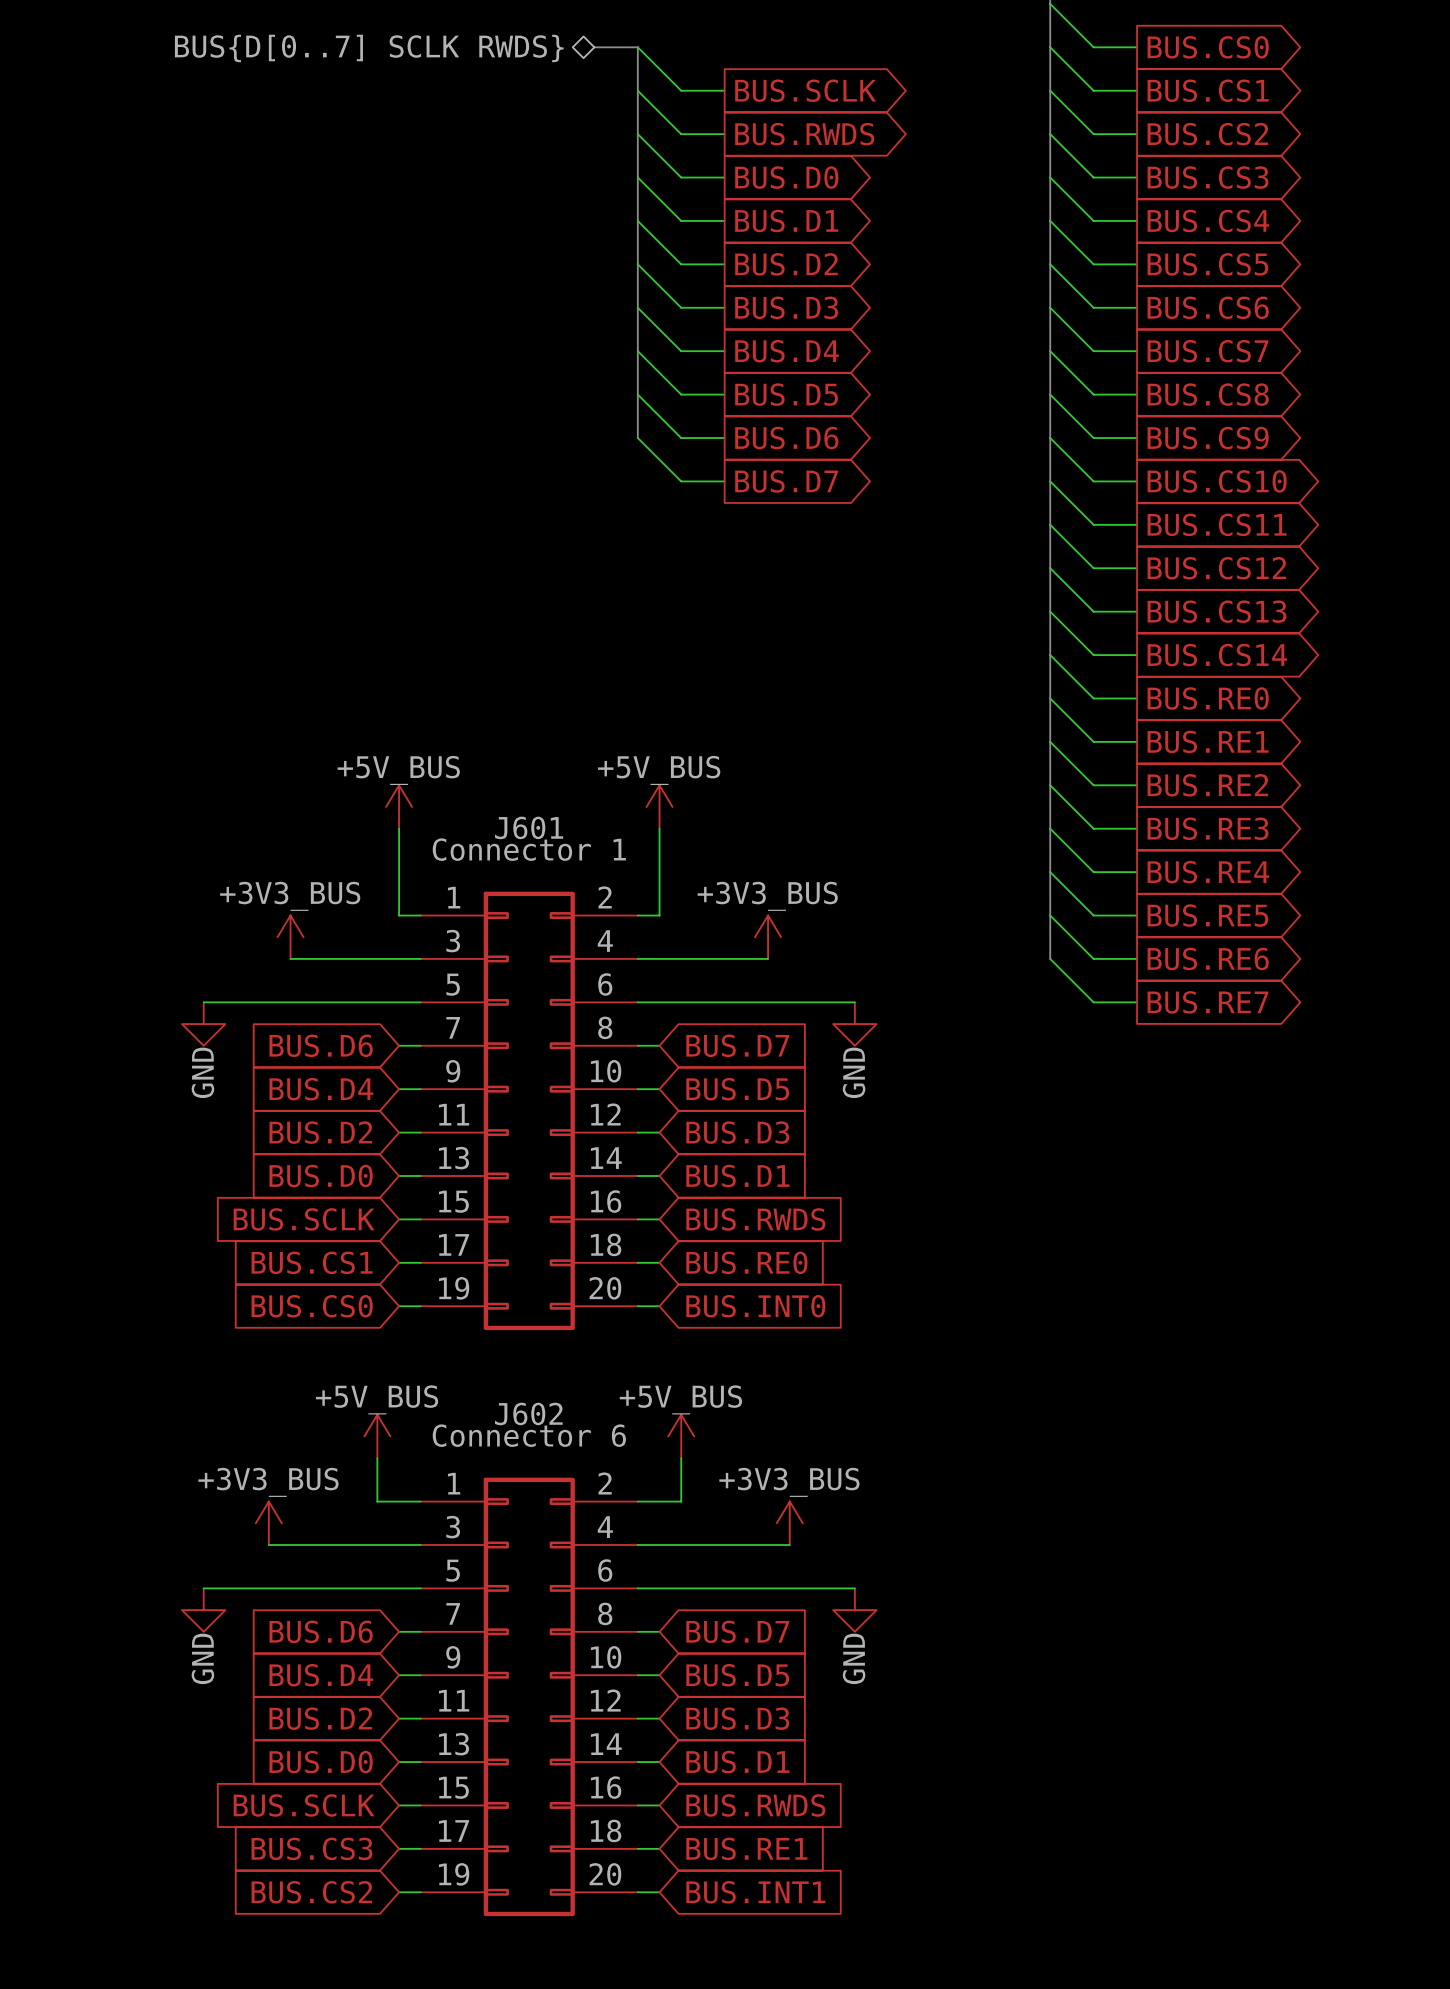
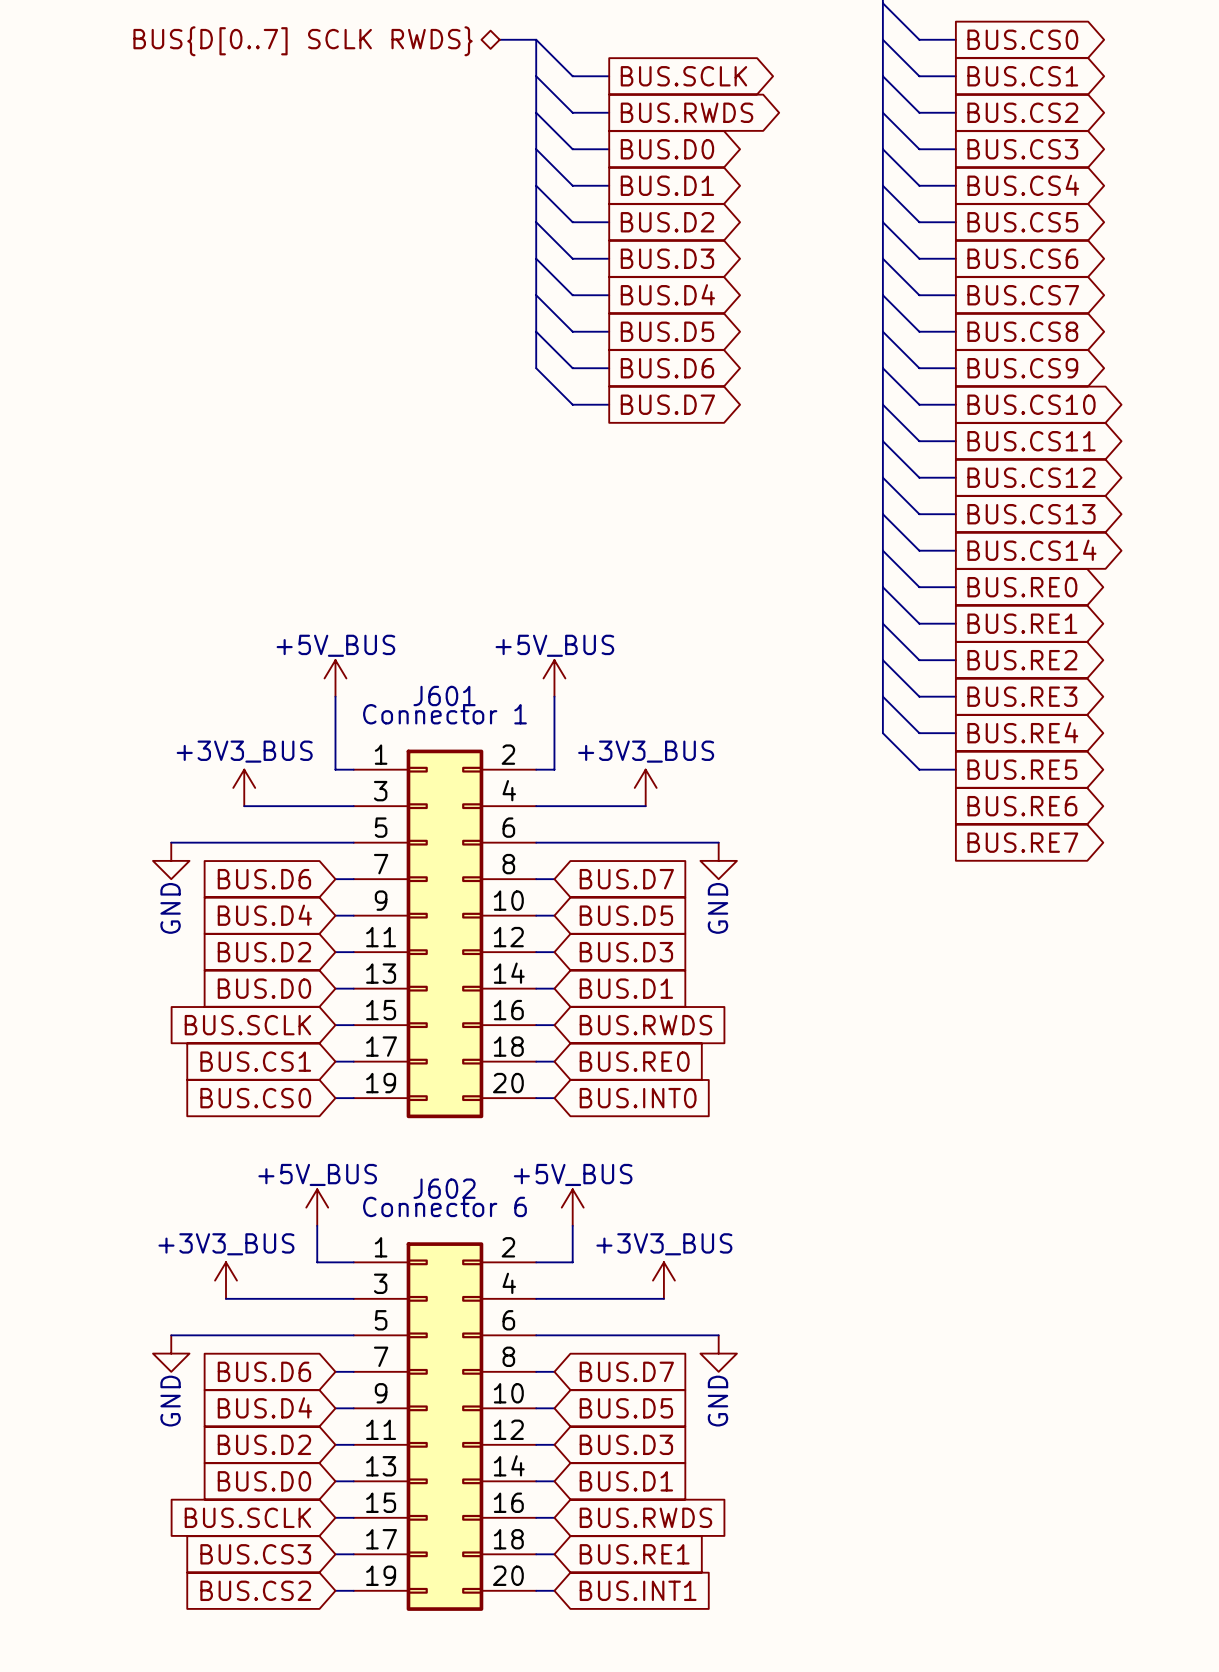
bus: (1050, 872) (1050, 958) -> none
wire: (1050, 915) (1093, 958) (1137, 958) -> none
wire: (1050, 958) (1093, 1002) (1137, 1002) -> none

